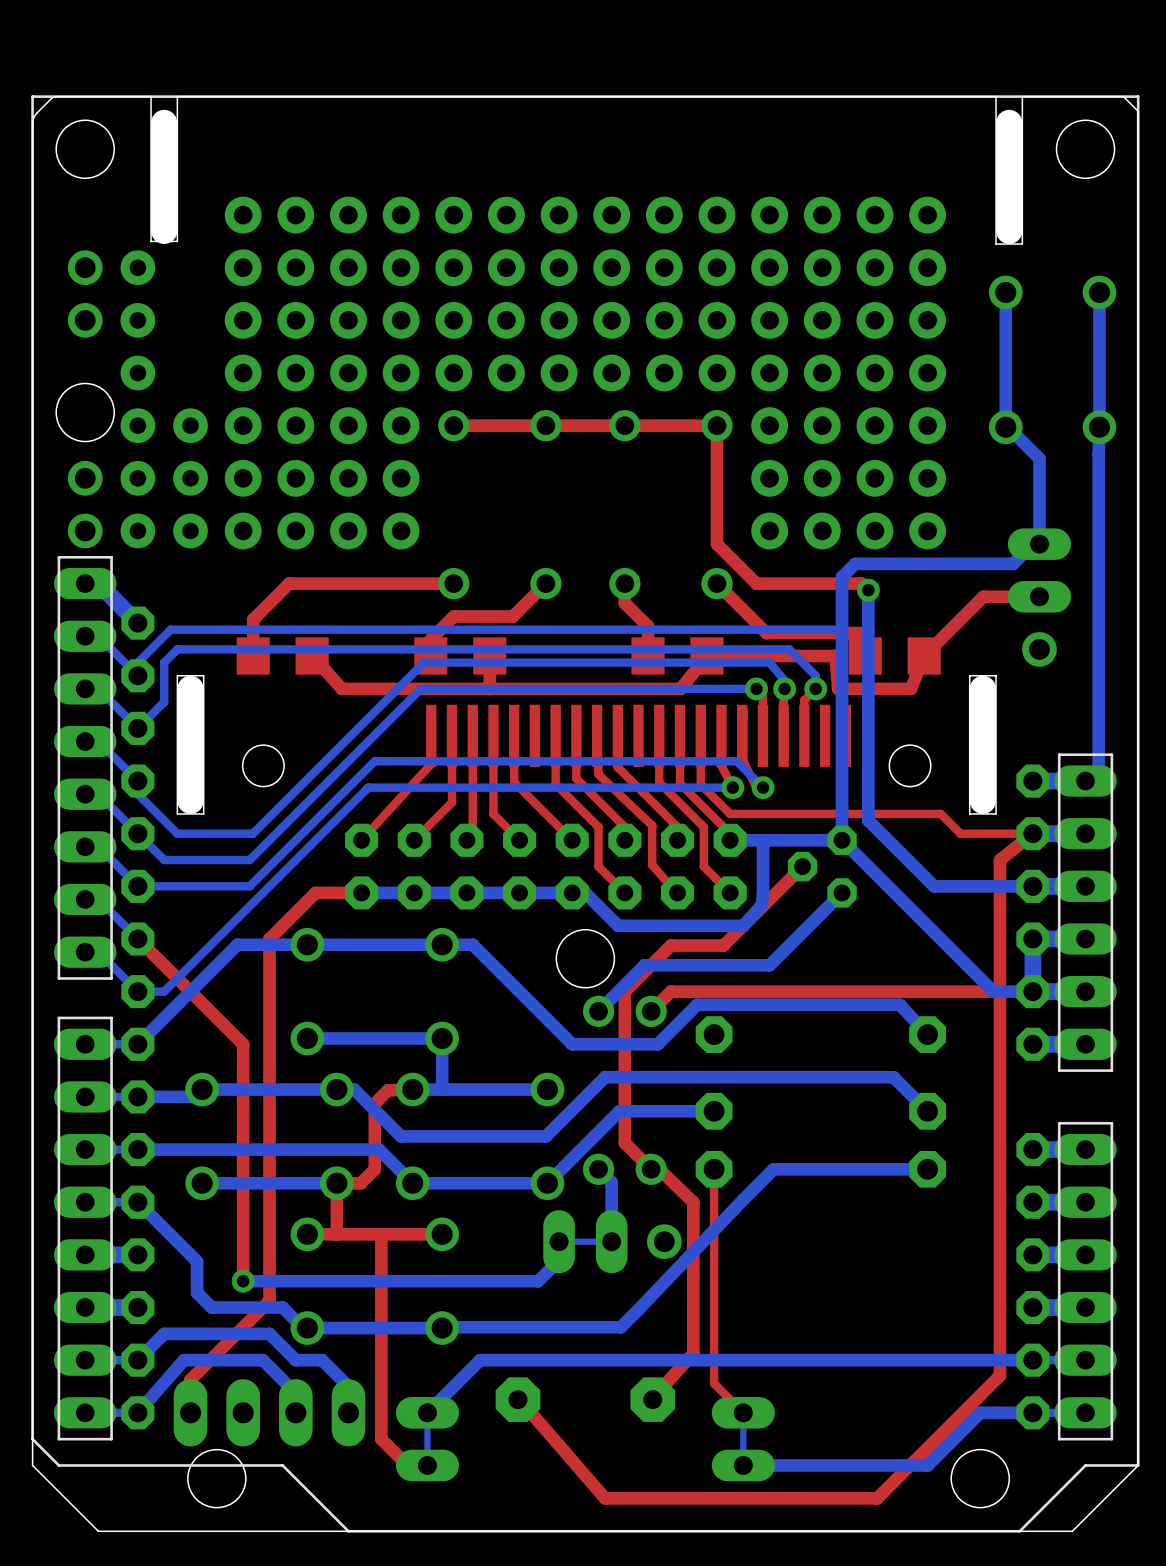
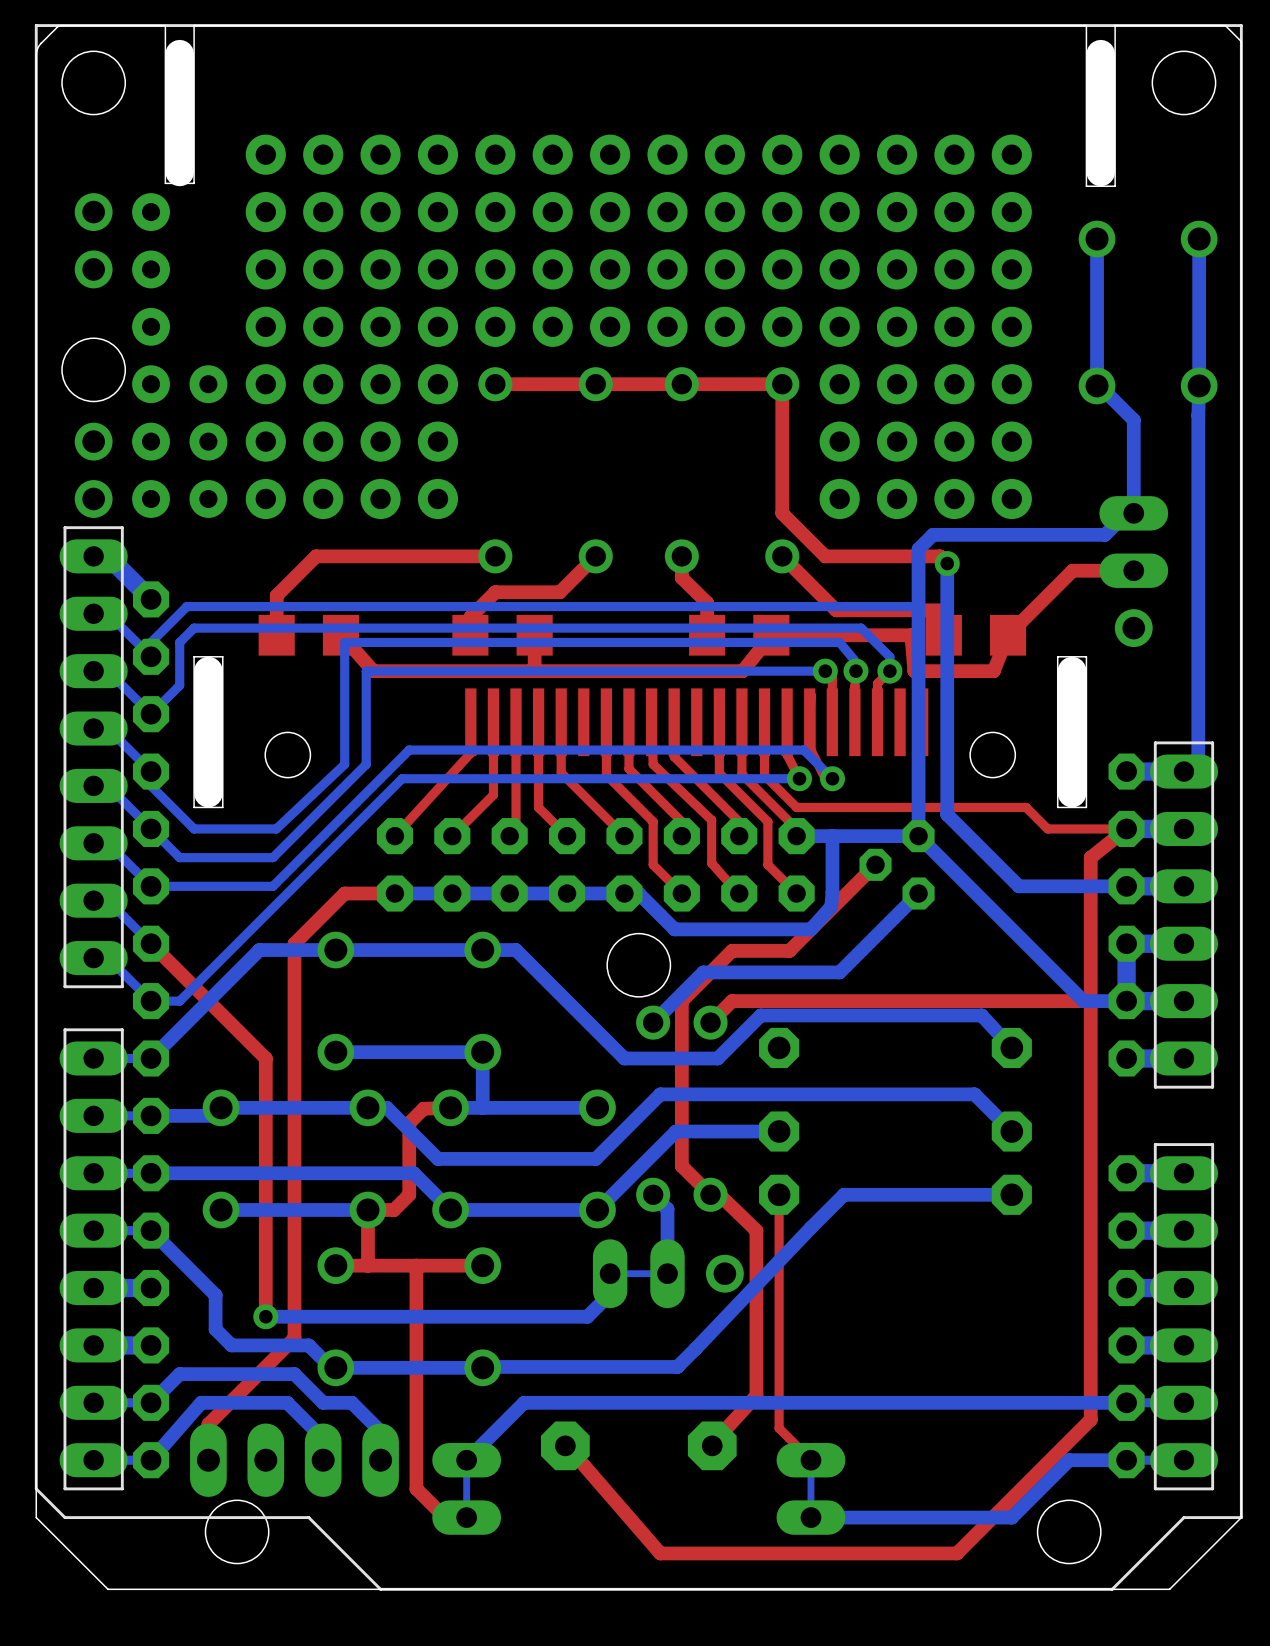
bottom track: (423, 662) (252, 833) -> (462, 642) (344, 642) (344, 764) (276, 828)
bottom track: (420, 688) (335, 774) -> (459, 671) (366, 671) (366, 764)

